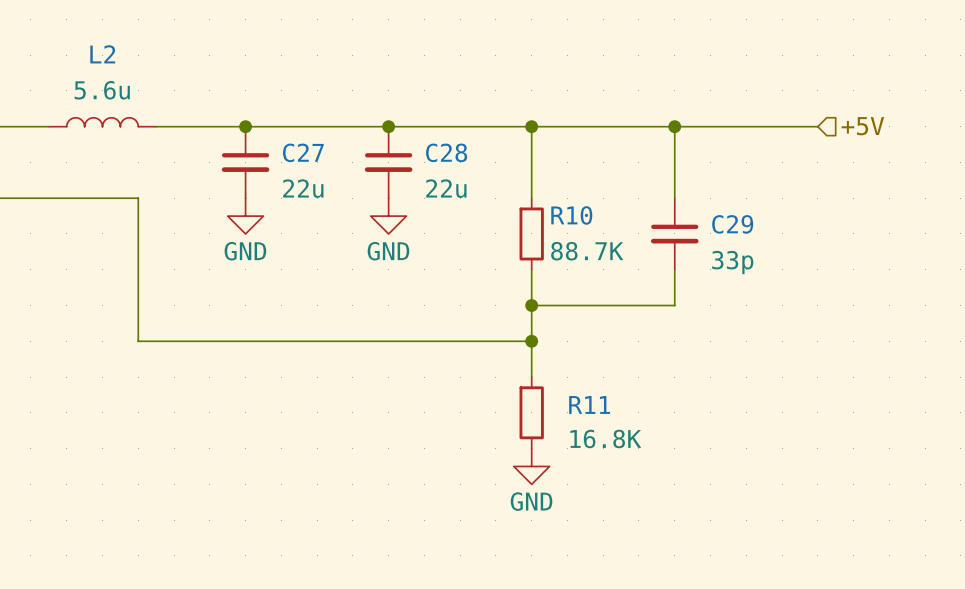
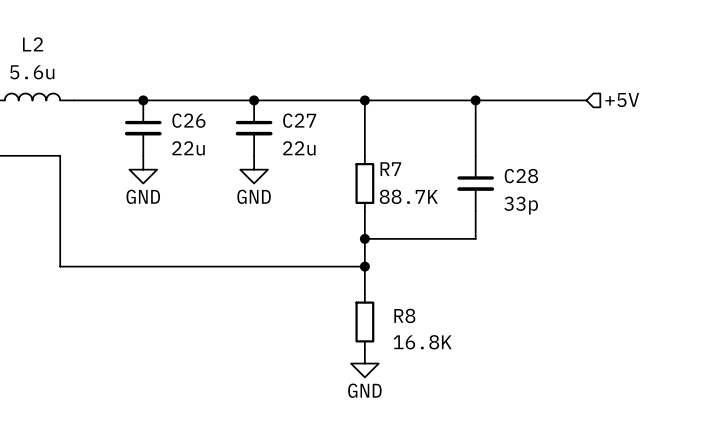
C27 name: C27 (303, 152) -> C26 (188, 120)
C28 name: C28 (446, 152) -> C27 (299, 120)
R10 name: R10 (571, 215) -> R7 (390, 169)
C29 name: C29 (732, 224) -> C28 (521, 176)
R11 name: R11 (589, 404) -> R8 (404, 315)

